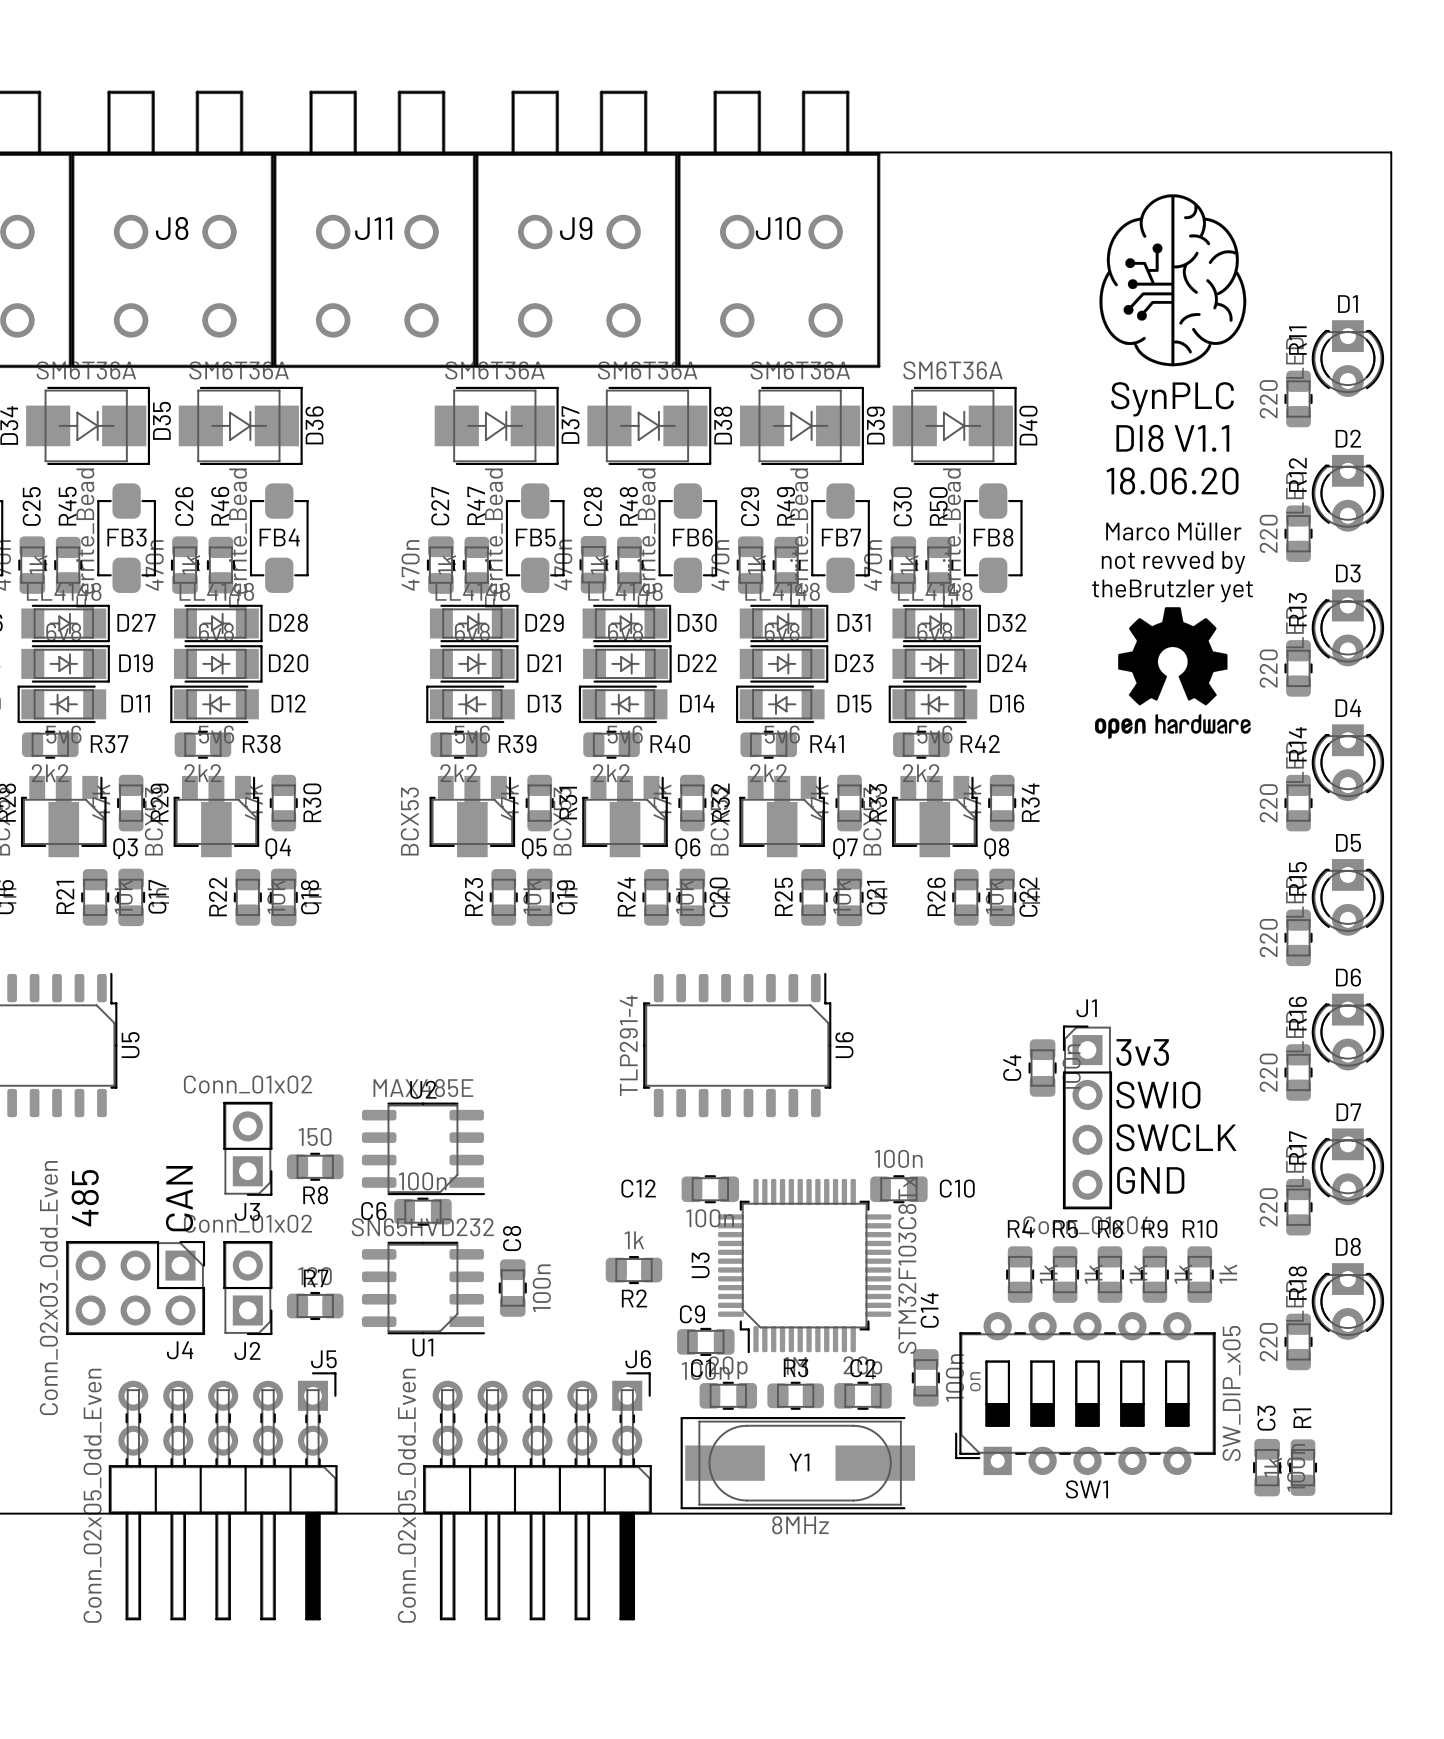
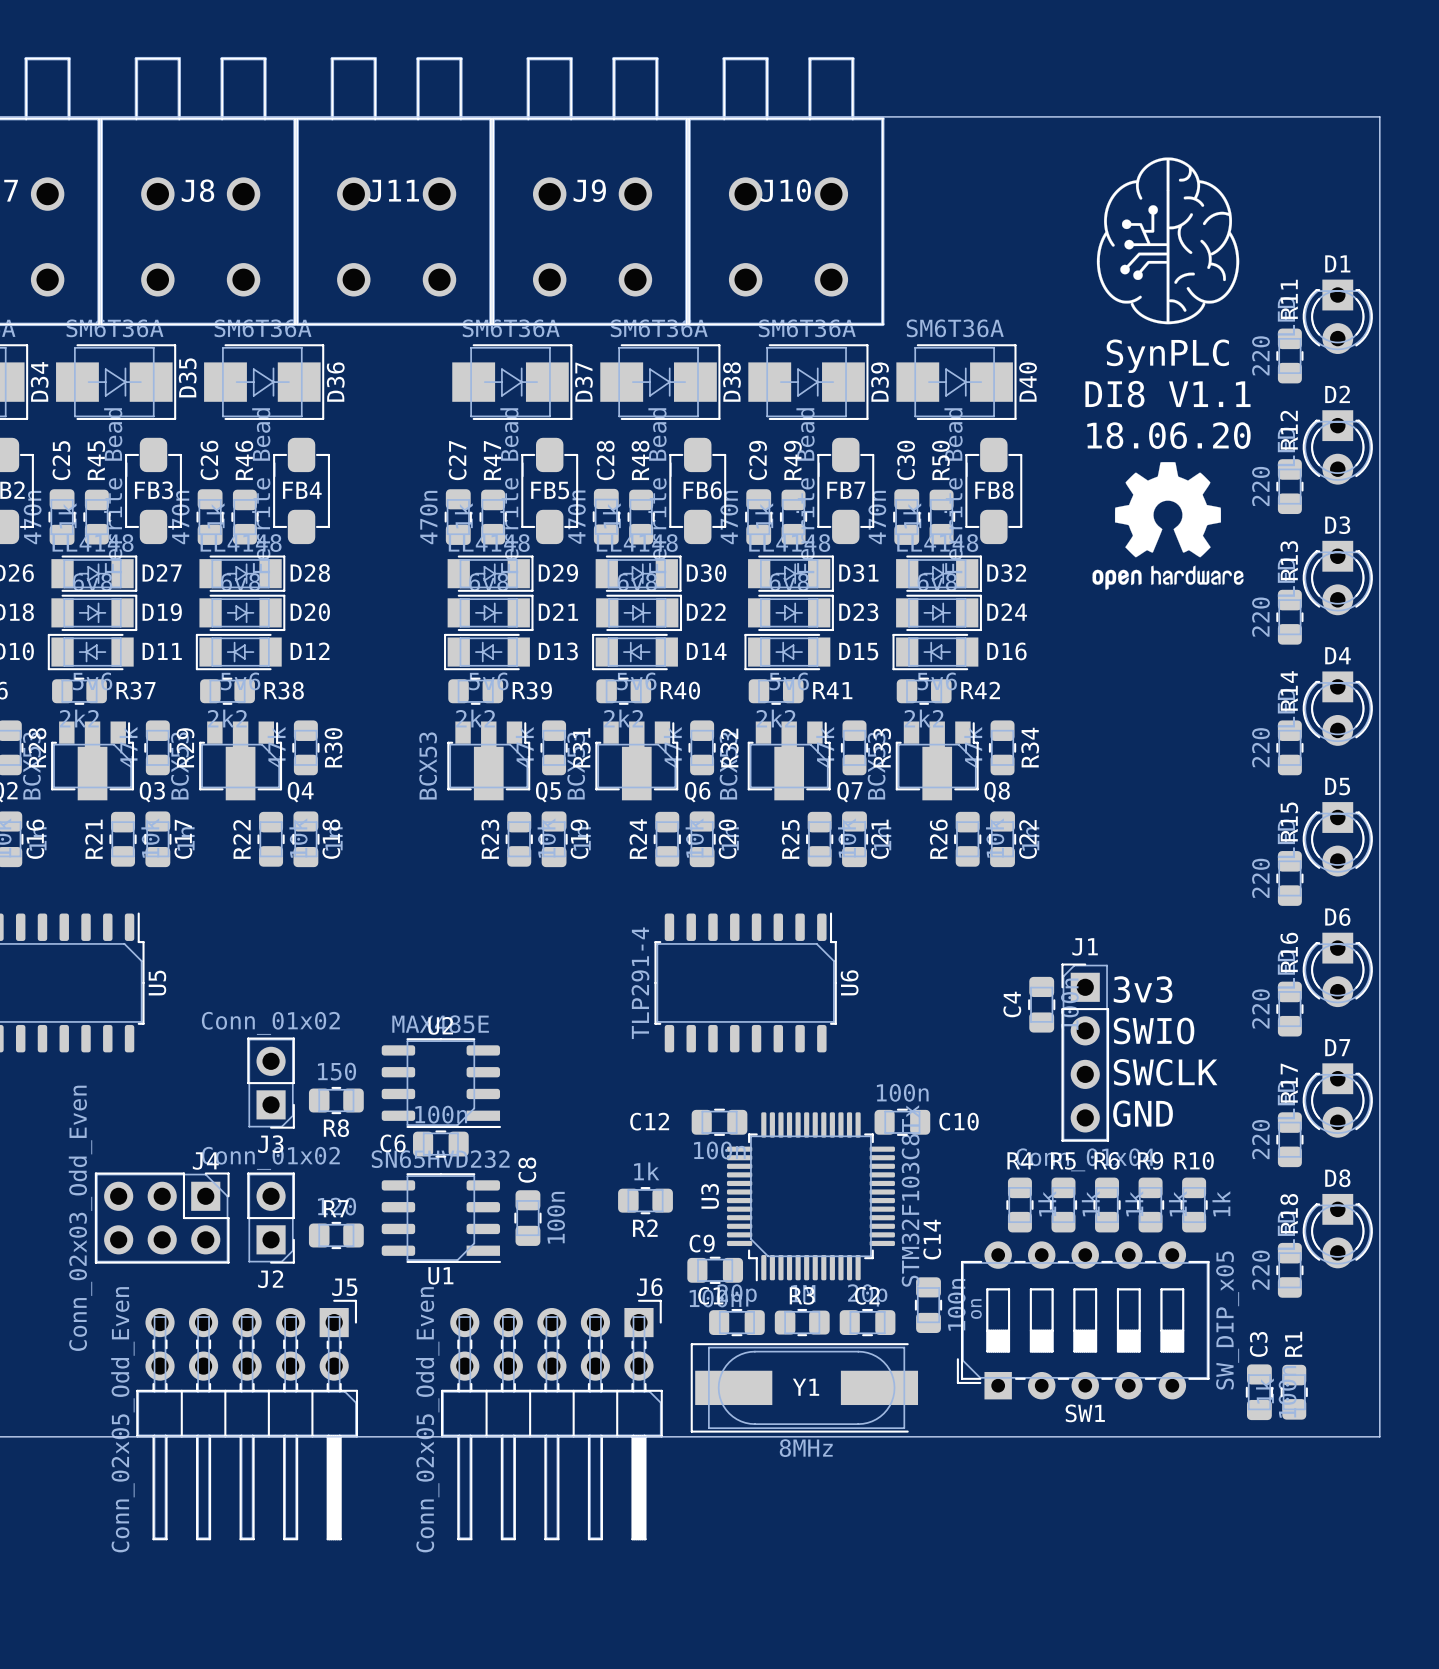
text: Marco Müller (1173, 531) -> none
text: not revved by (1173, 562) -> none
text: theBrutzler yet (1172, 590) -> none
drawing position: (1172, 673) -> (1167, 525)
text: 485 (85, 1198) -> none
text: CAN (179, 1198) -> none
J4 name position: J4 (180, 1350) -> J4 (205, 1161)

